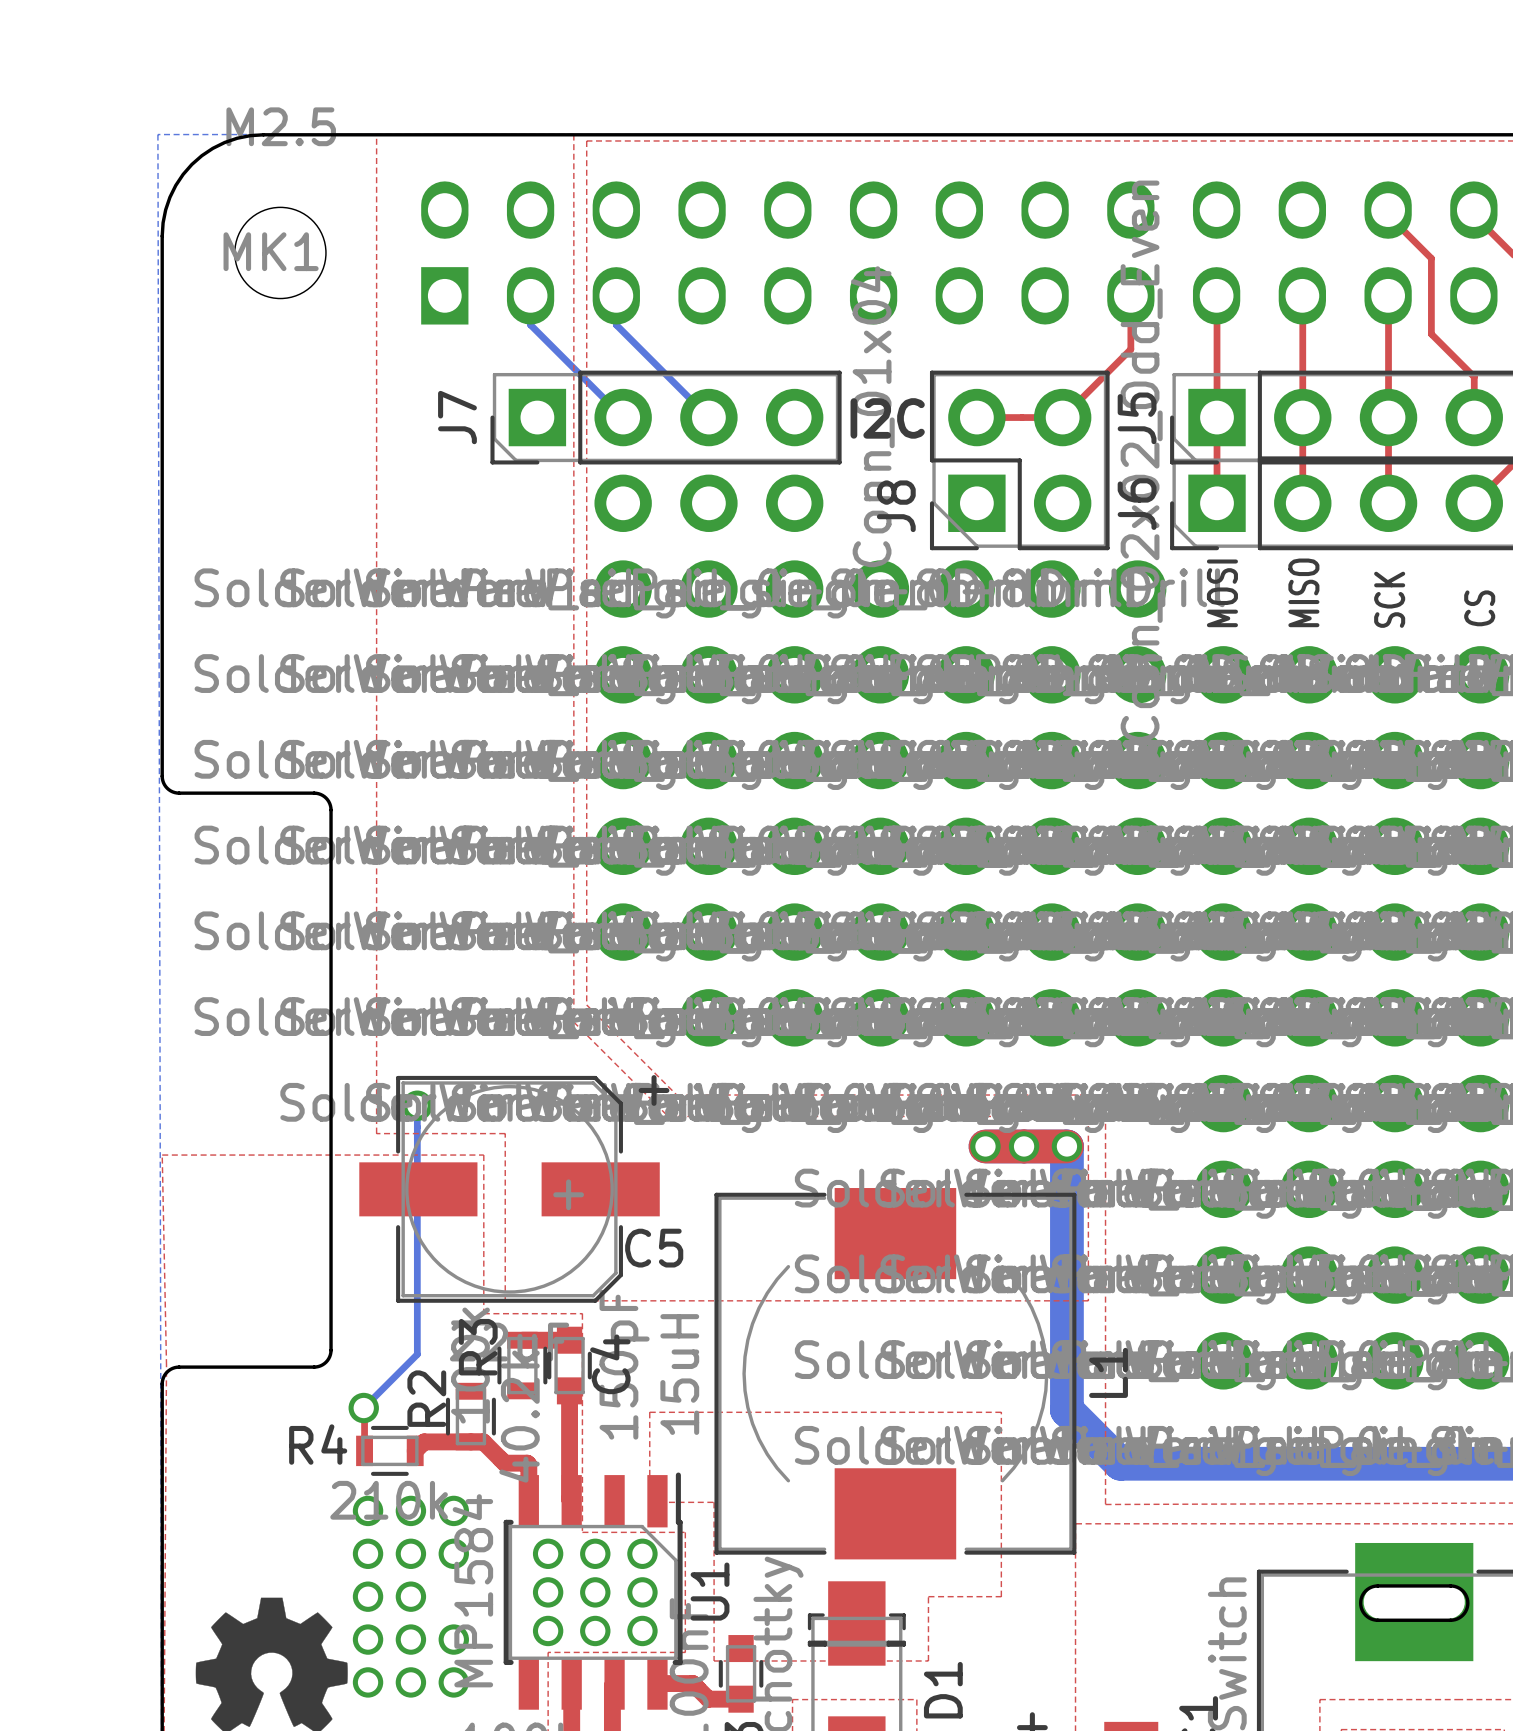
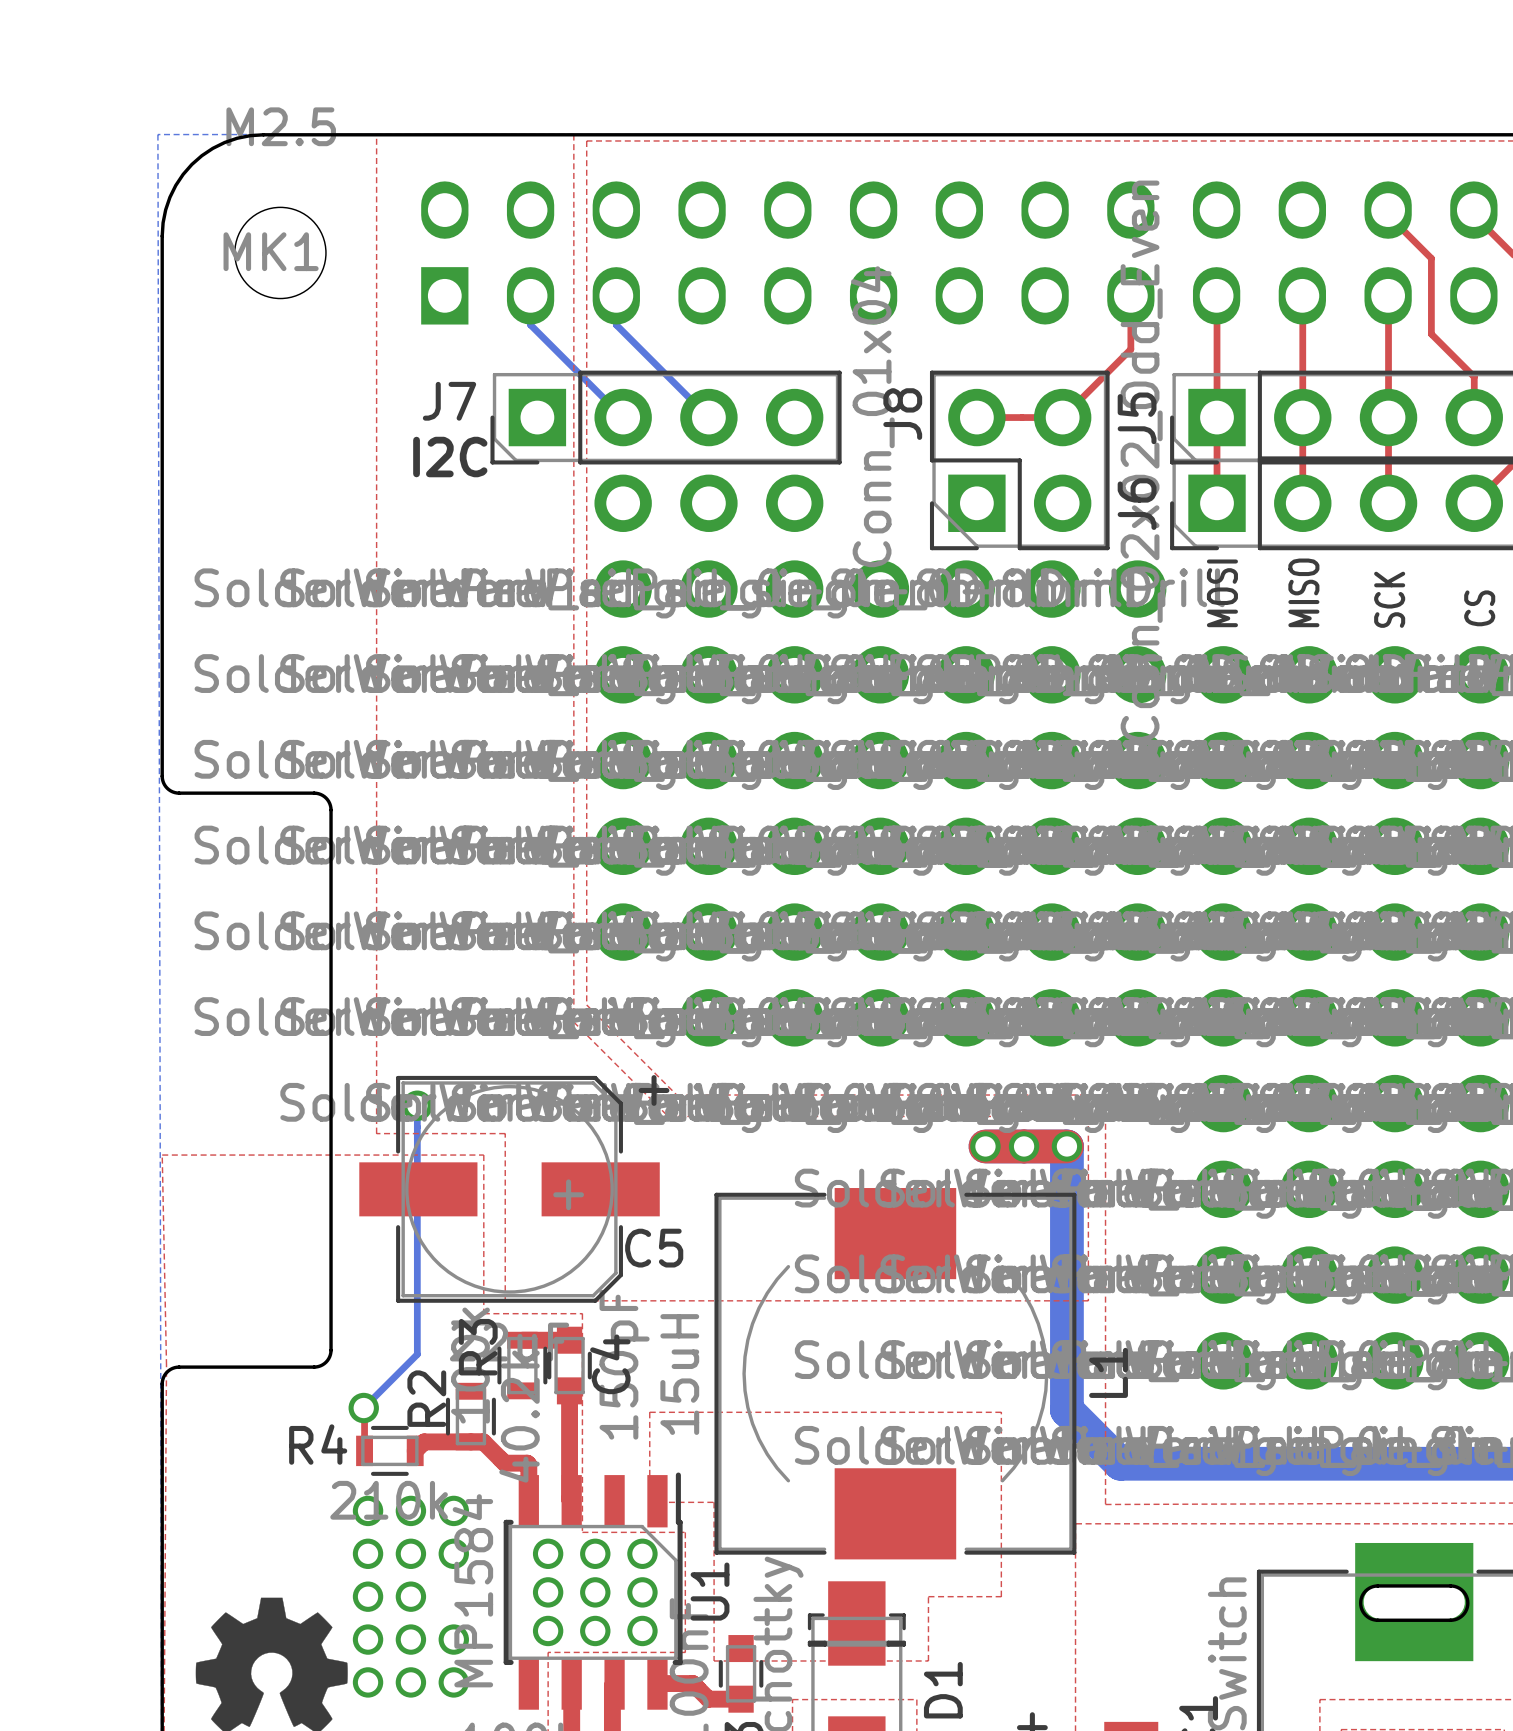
J7 name rotation: 0° (457, 417) -> 90° clockwise (449, 401)
text position: I2C (887, 418) -> I2C (450, 457)
J8 name position: J8 (896, 506) -> J8 (902, 414)

